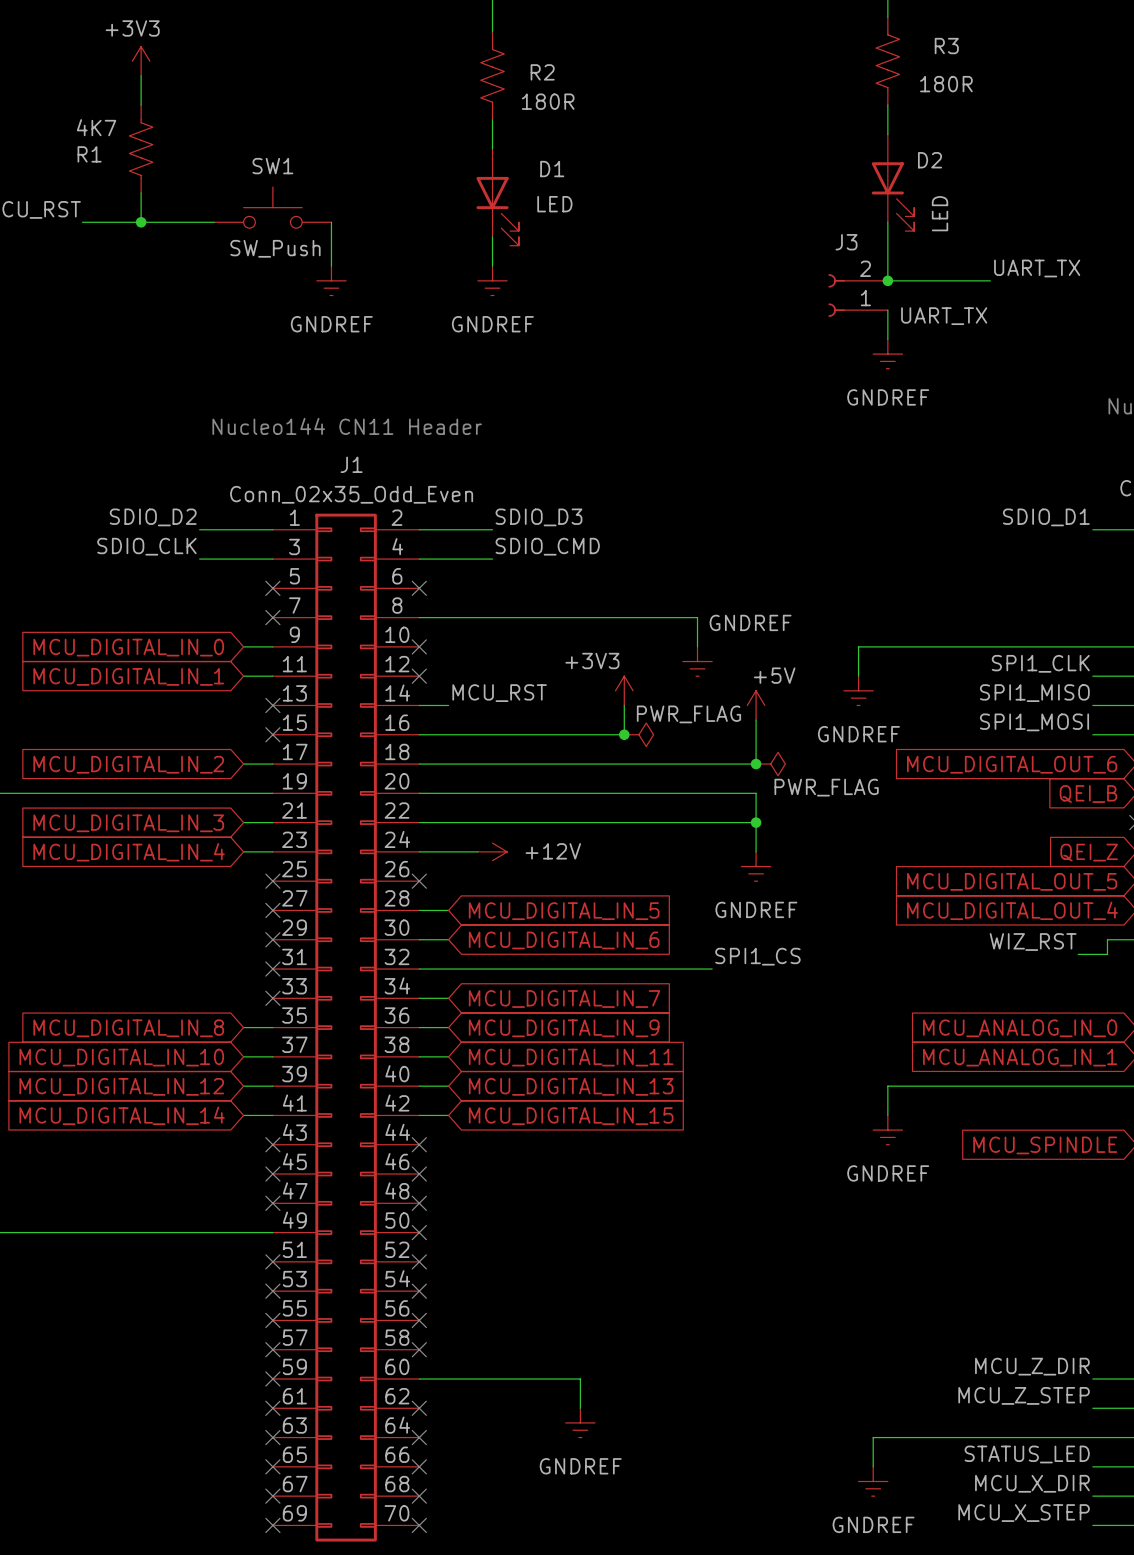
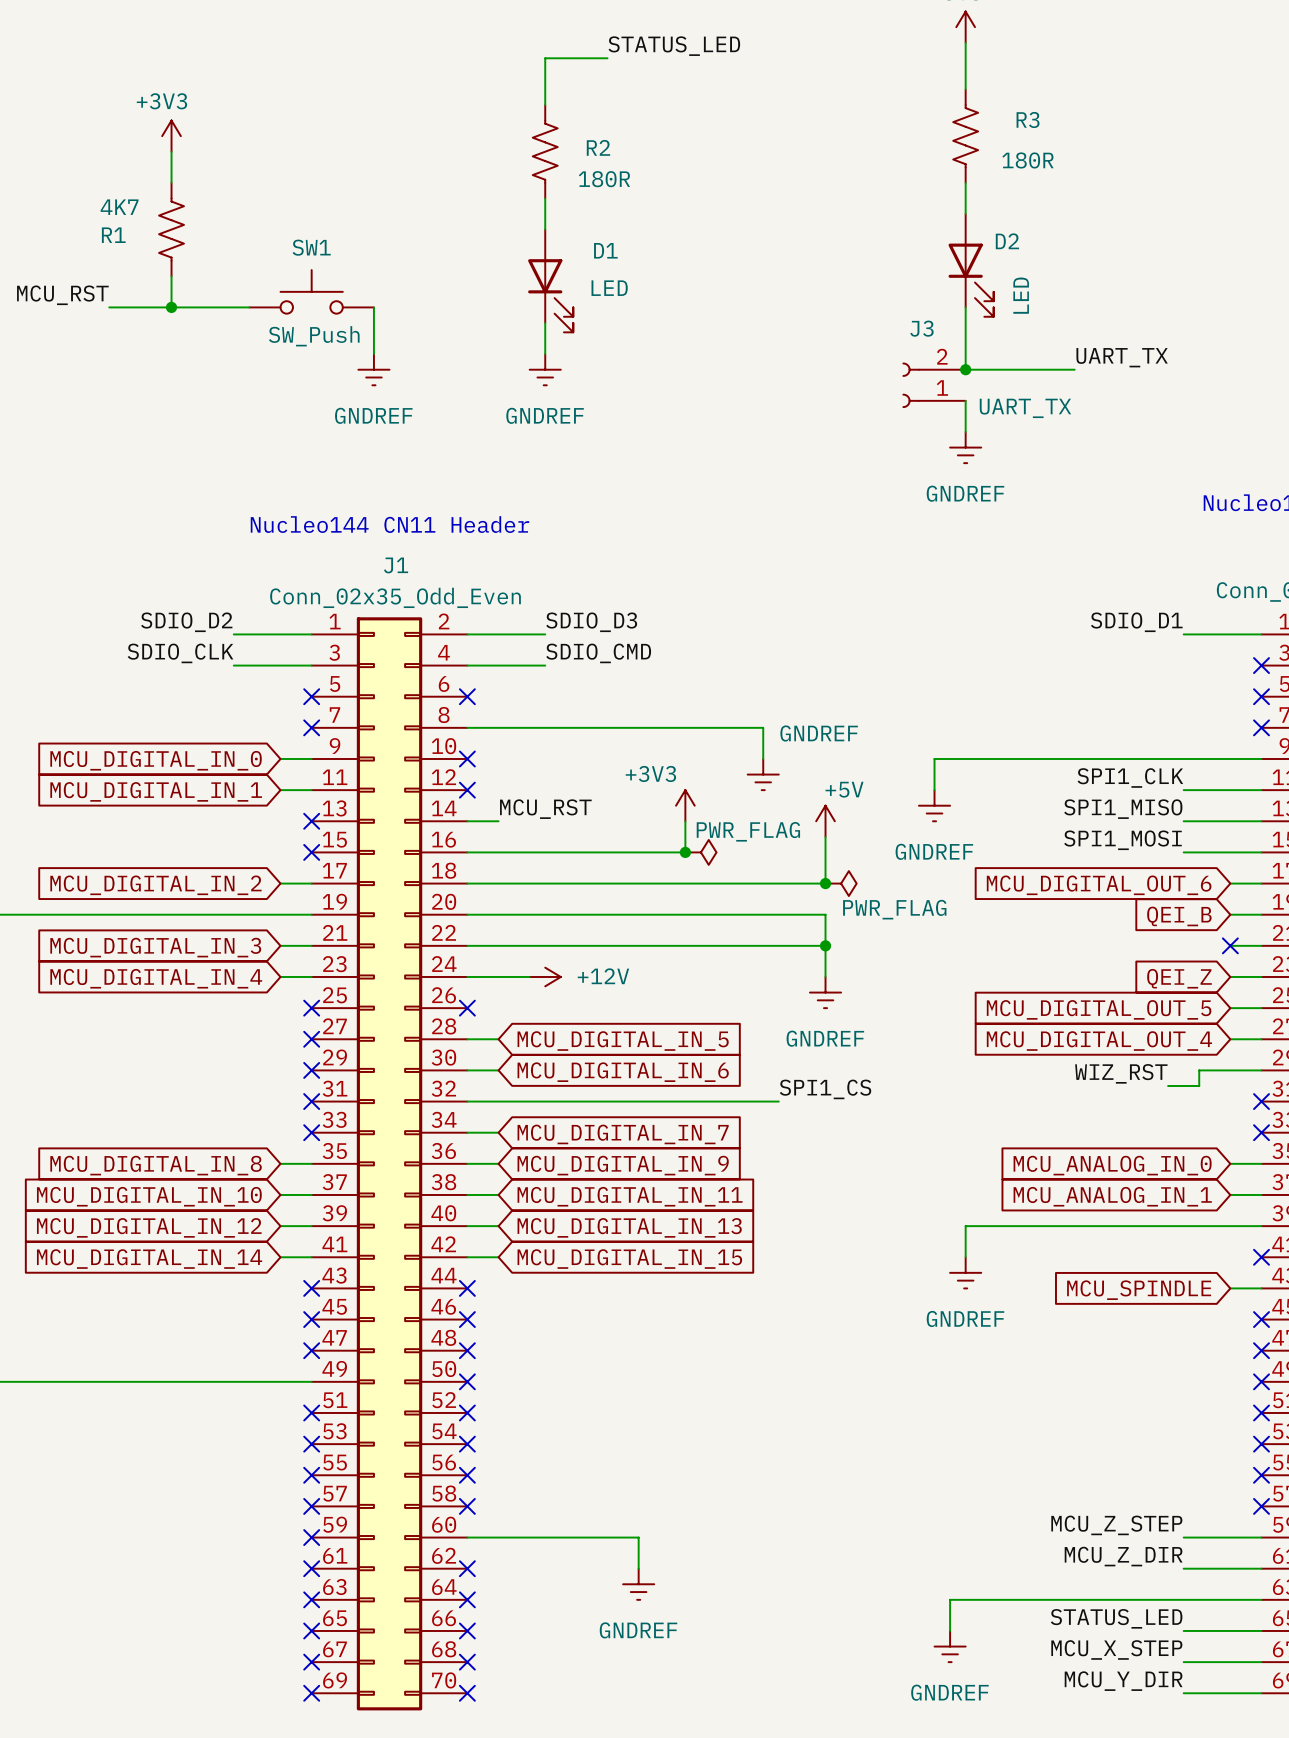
label: MCU_Z_DIR (1032, 1366) -> MCU_Z_STEP (1116, 1525)
label: MCU_Z_STEP (1024, 1395) -> MCU_Z_DIR (1123, 1556)
label: MCU_X_DIR (1032, 1483) -> MCU_X_STEP (1116, 1649)
label: MCU_X_STEP (1024, 1513) -> MCU_Y_DIR (1123, 1681)

